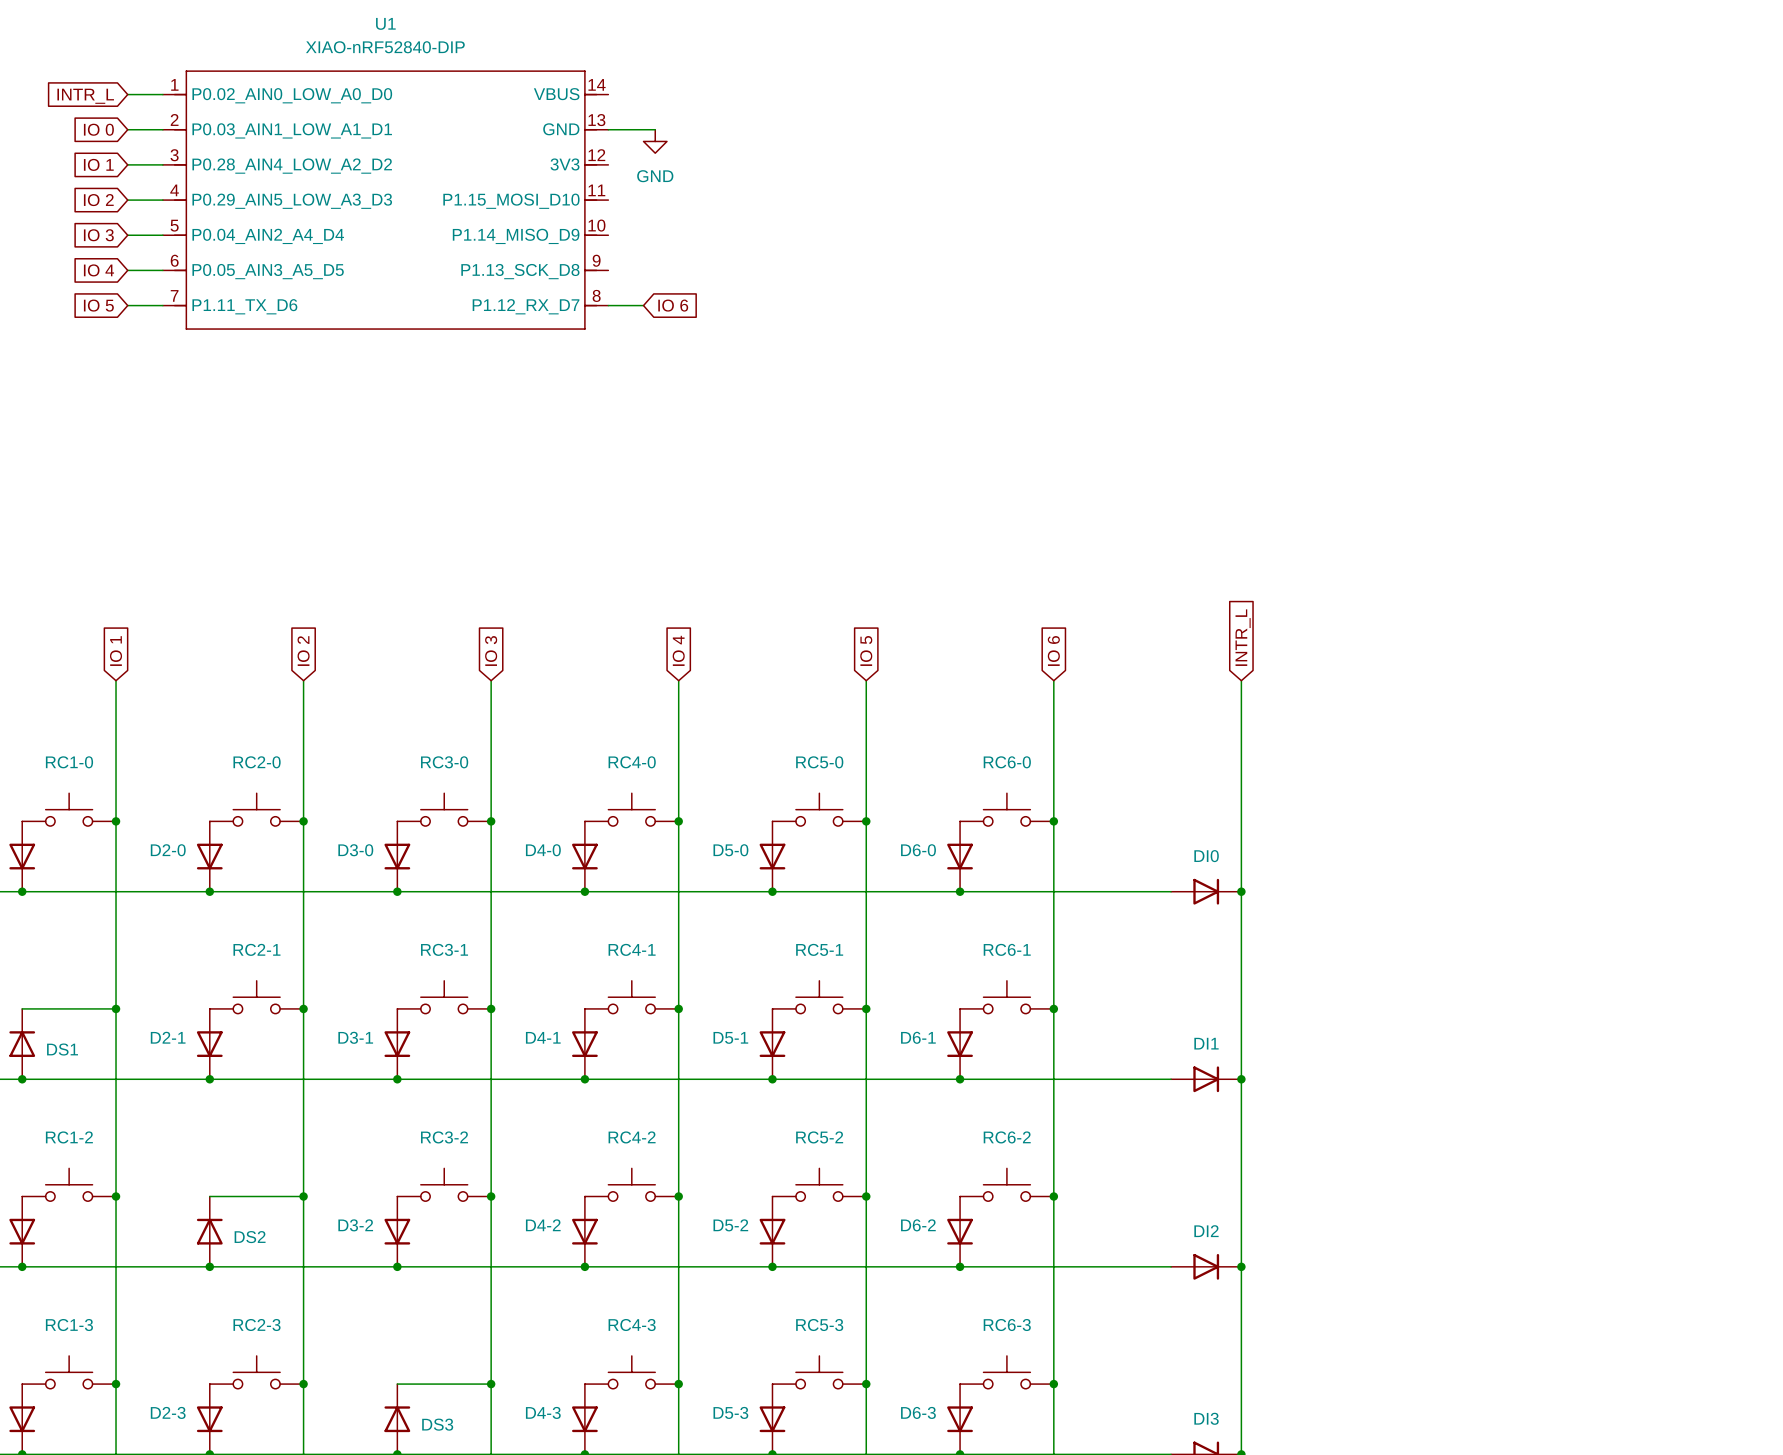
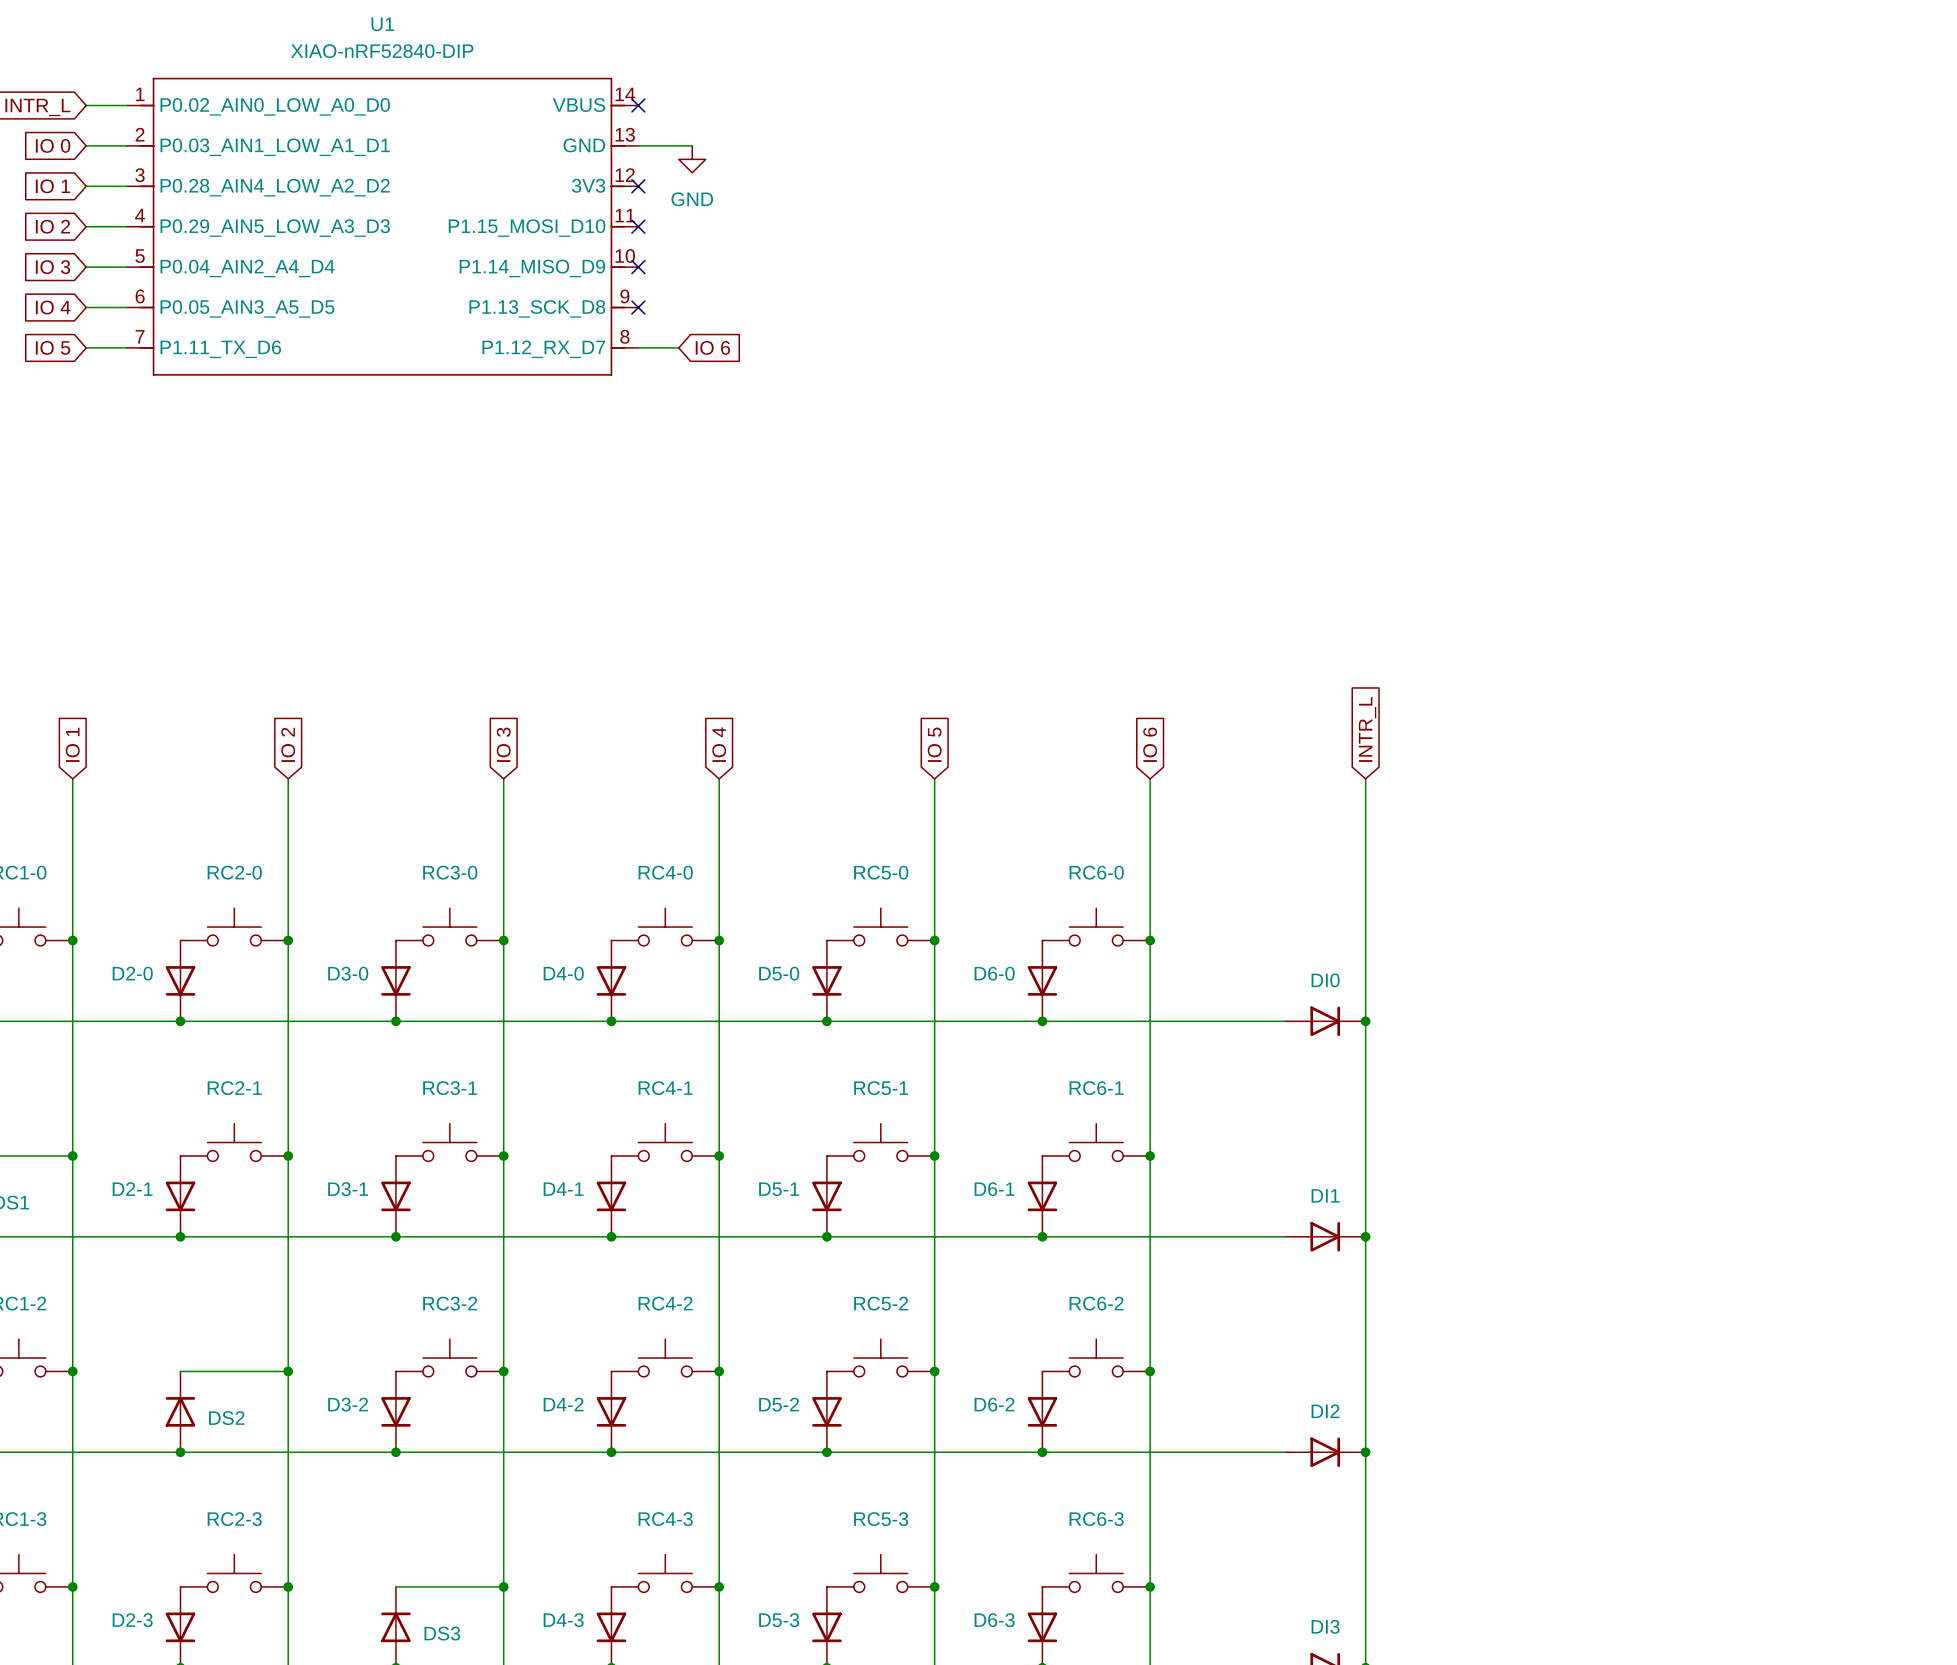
no-connect mark: none -> (638, 105)
no-connect mark: none -> (638, 186)
no-connect mark: none -> (638, 226)
no-connect mark: none -> (638, 267)
no-connect mark: none -> (638, 307)

